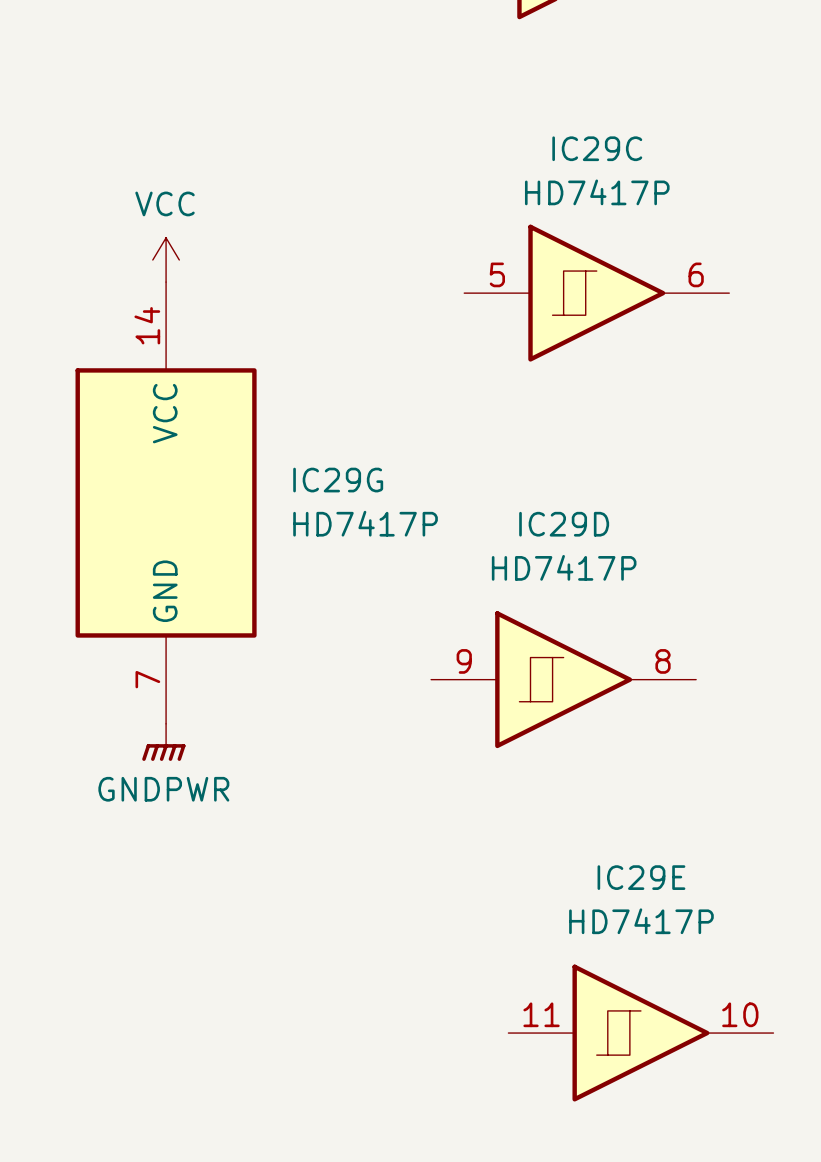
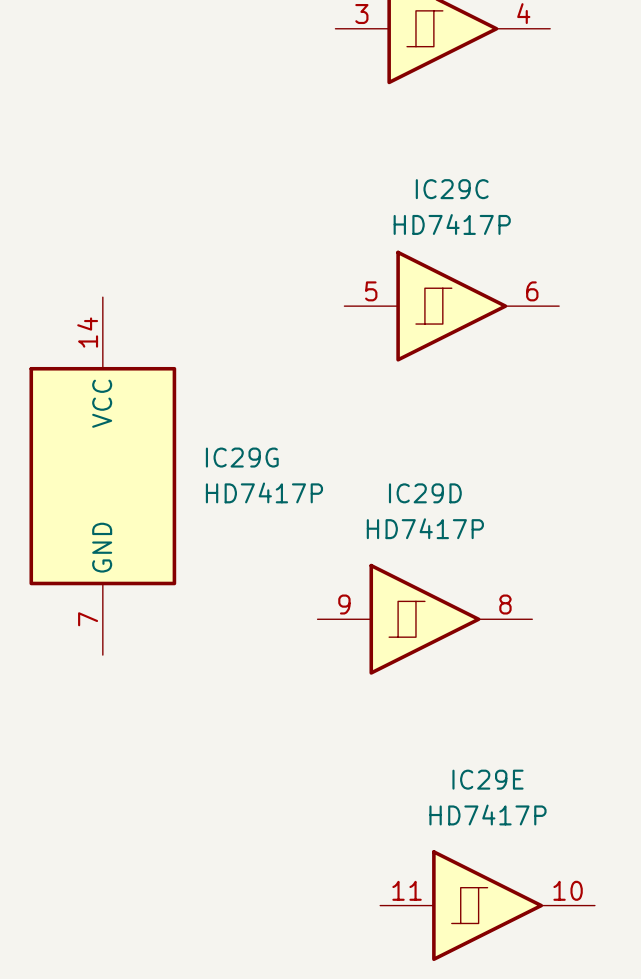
power symbol: VCC (166, 260) -> none
power symbol: GNDPWR (163, 742) -> none

